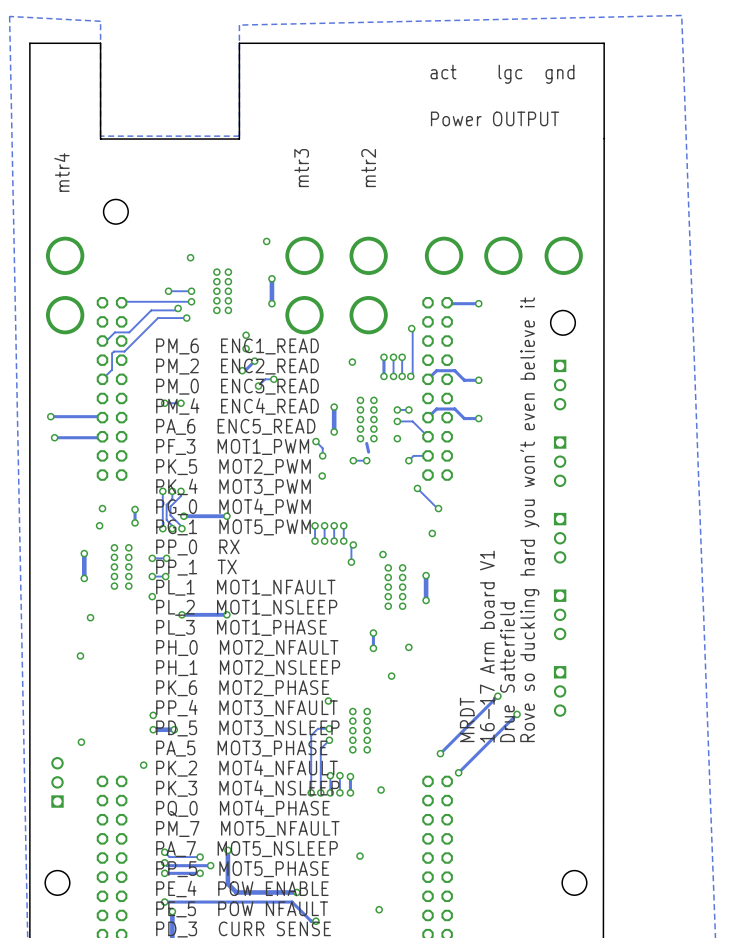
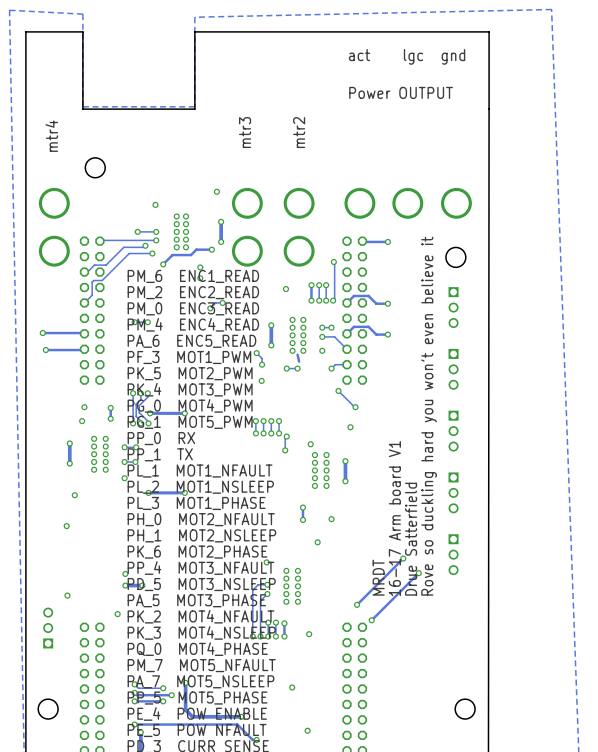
track: none -> (211, 249) (196, 249) (191, 255) (172, 255) (163, 264)
via: none -> (211, 249)
via: none -> (163, 264)
track: (254, 361) (245, 370) (242, 370) -> none
via: (254, 361) -> none
via: (242, 370) -> none

